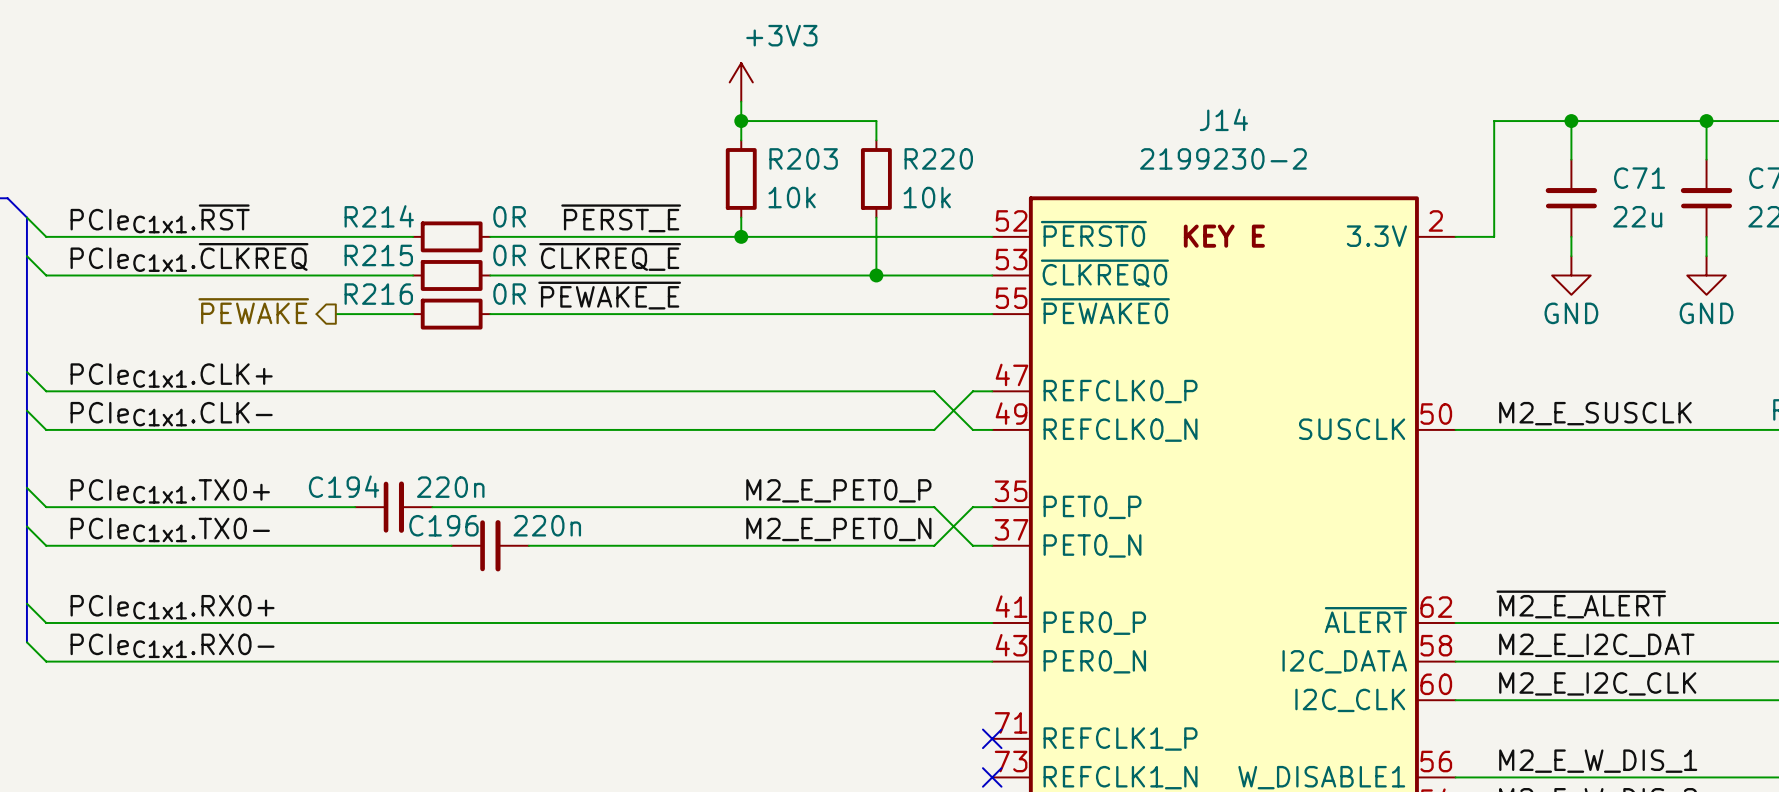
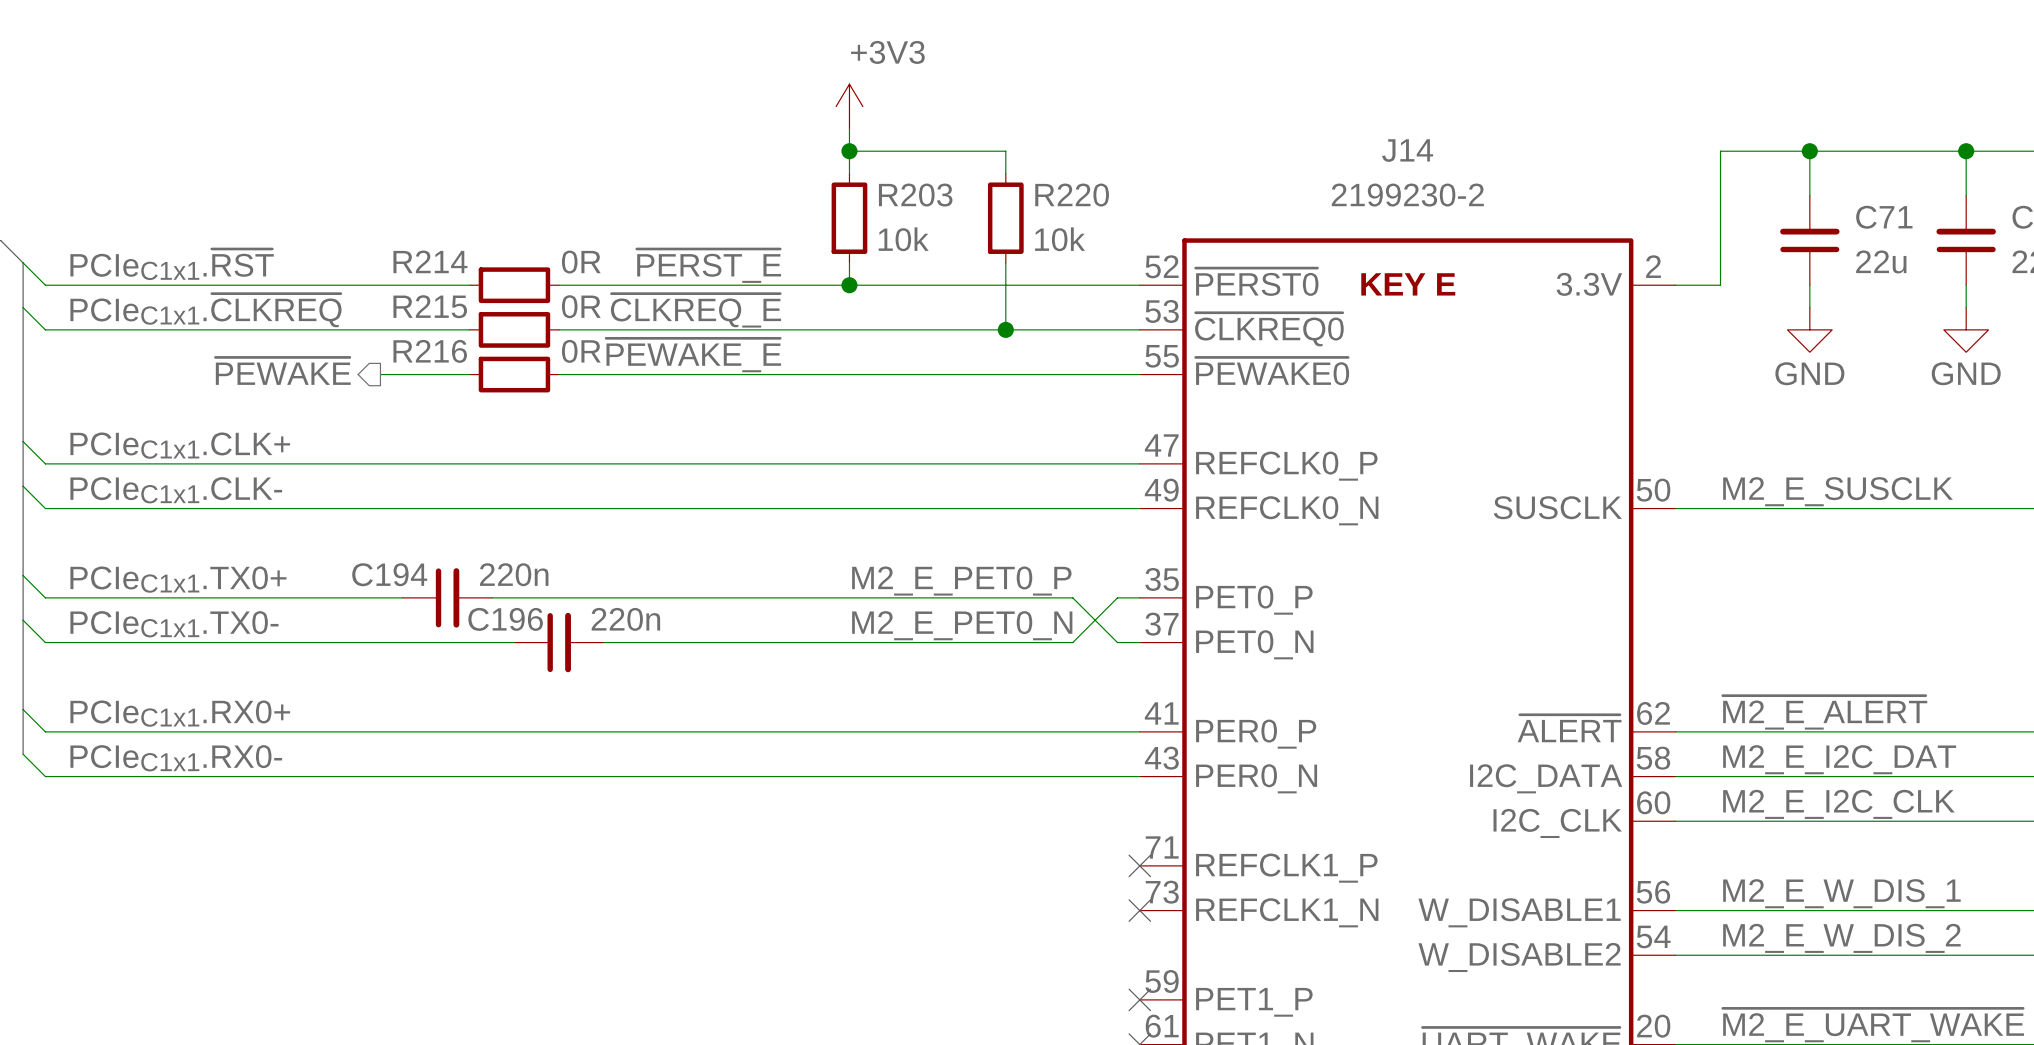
wire: (934, 391) (972, 429) -> (1072, 463) (1117, 463)
wire: (972, 391) (934, 429) -> (1117, 508) (1072, 508)

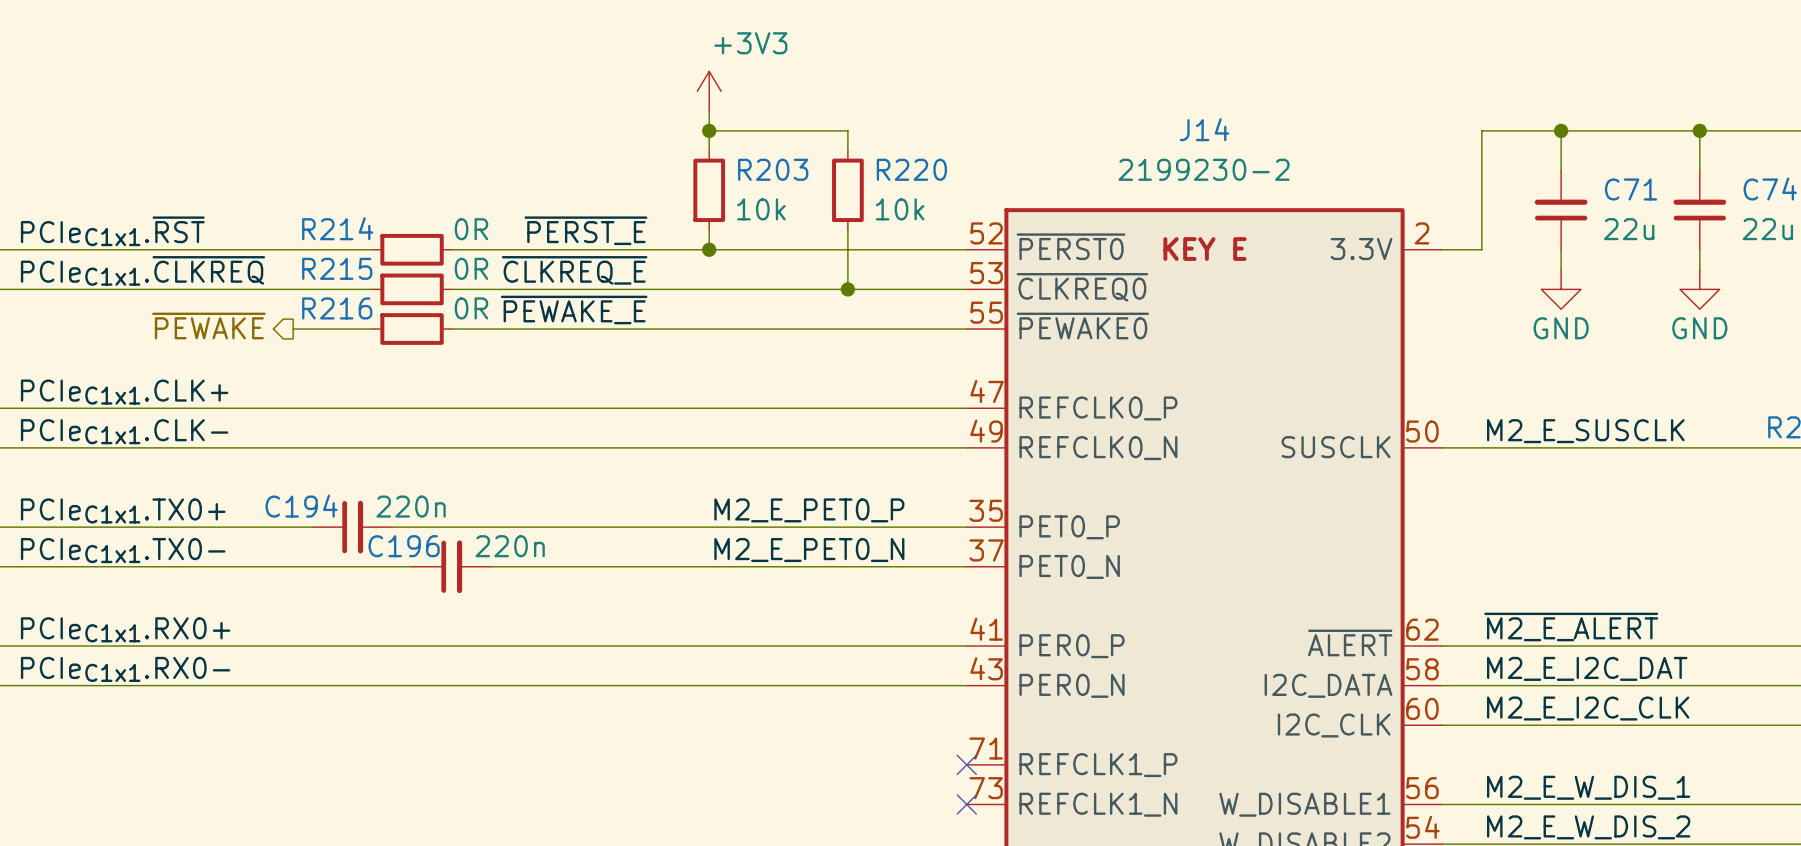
wire: (1072, 597) (1117, 642) -> (907, 527) (946, 527)
wire: (1117, 597) (1072, 642) -> (946, 566) (907, 566)

